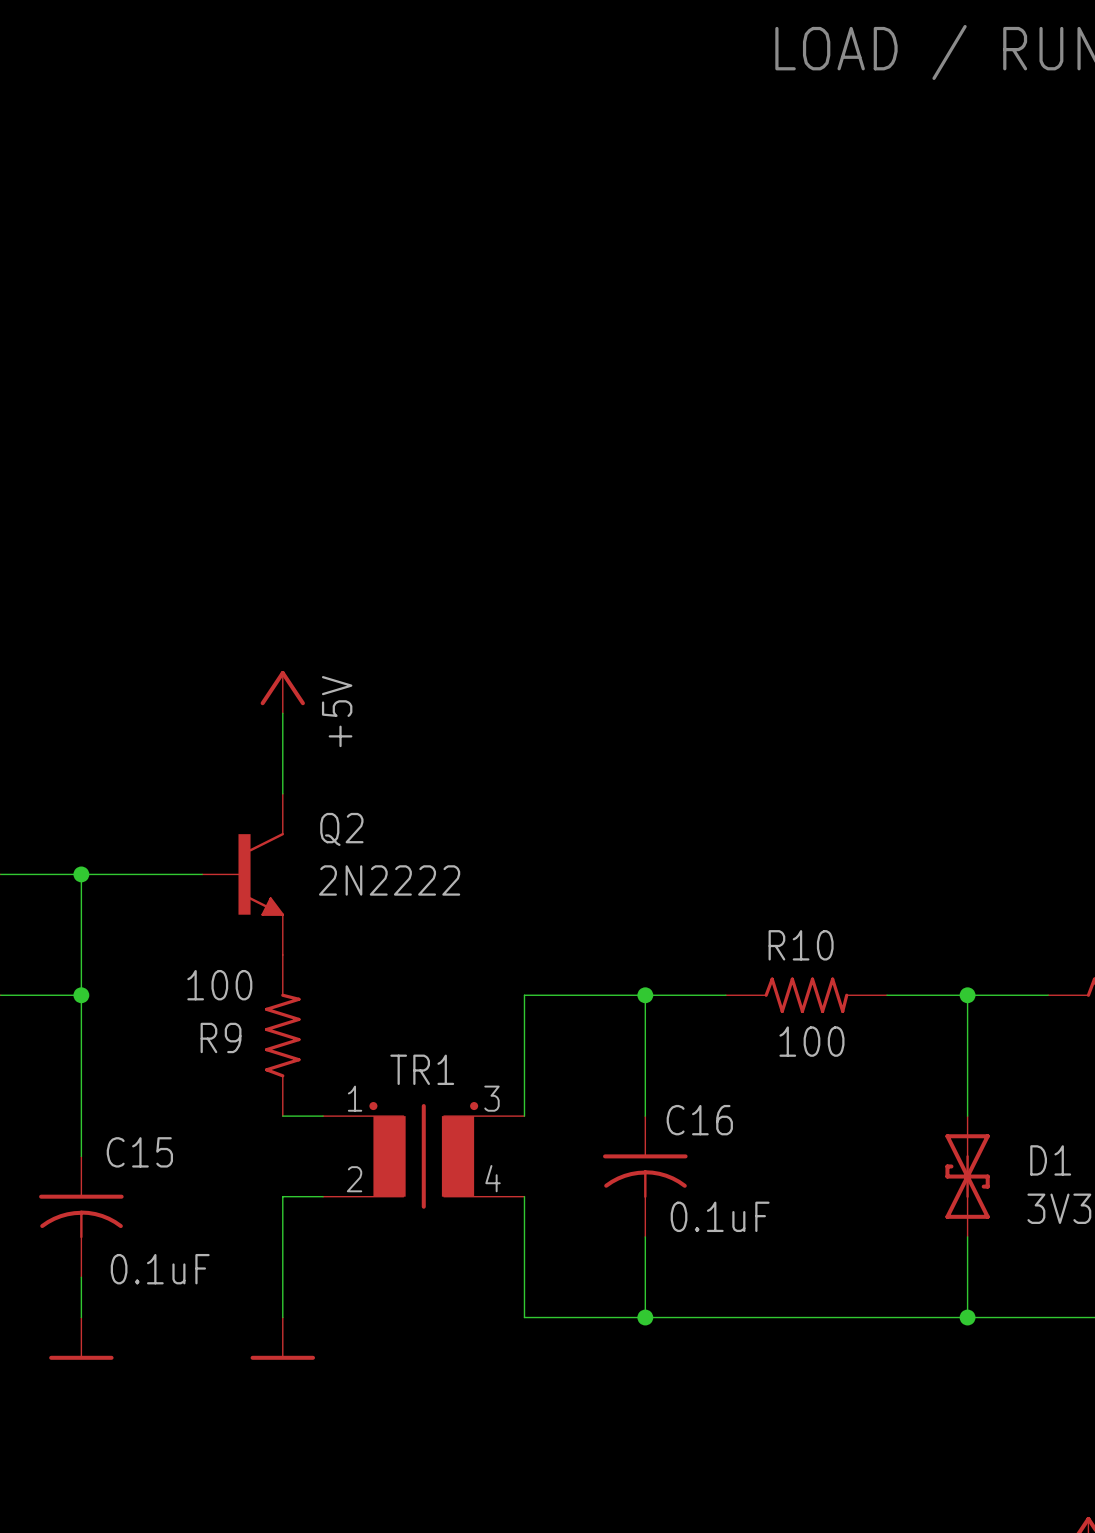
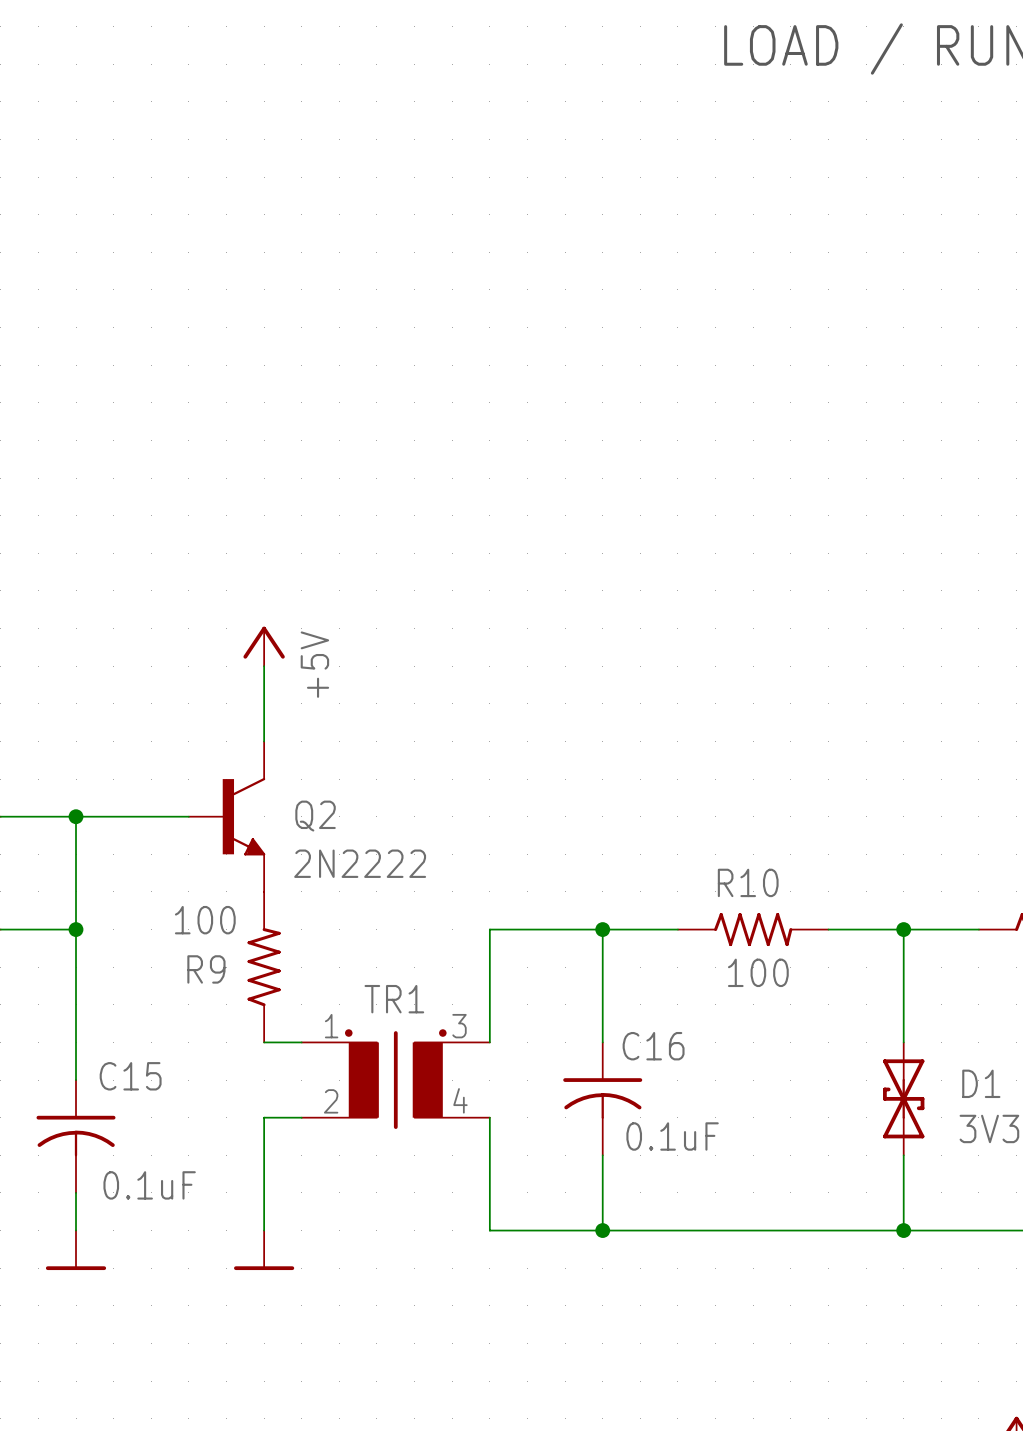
Q2 name position: Q2 (341, 829) -> Q2 (315, 816)
Q2 value position: 2N2222 (389, 880) -> 2N2222 (360, 863)

